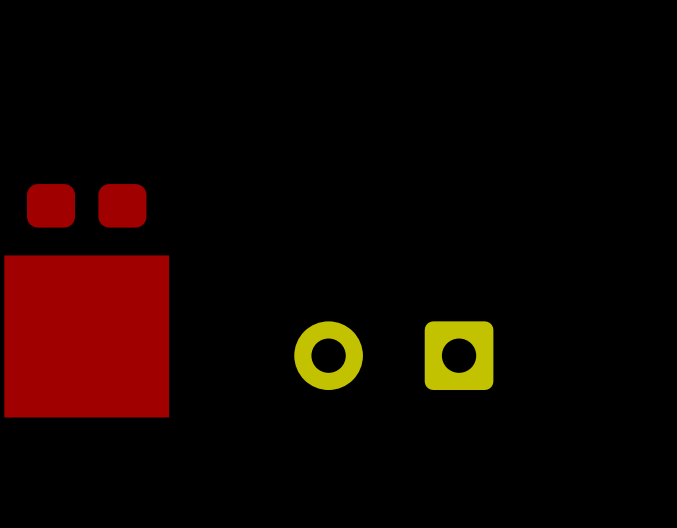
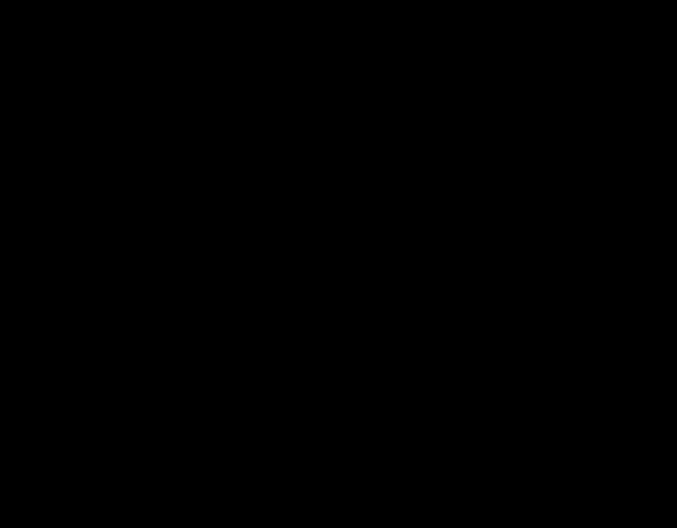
part: (86, 300) -> none
part: (393, 355) -> none

